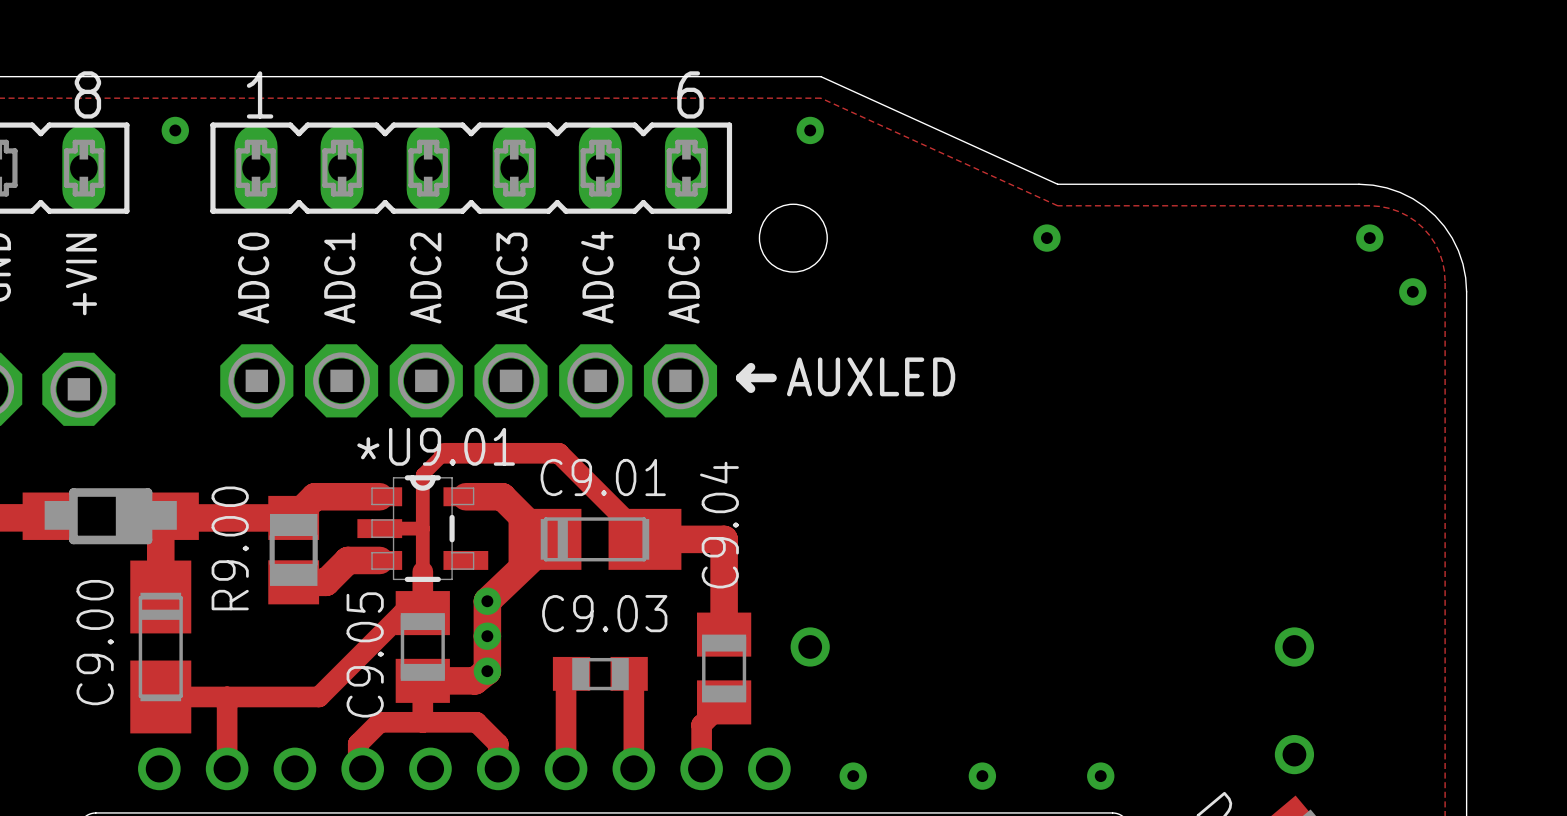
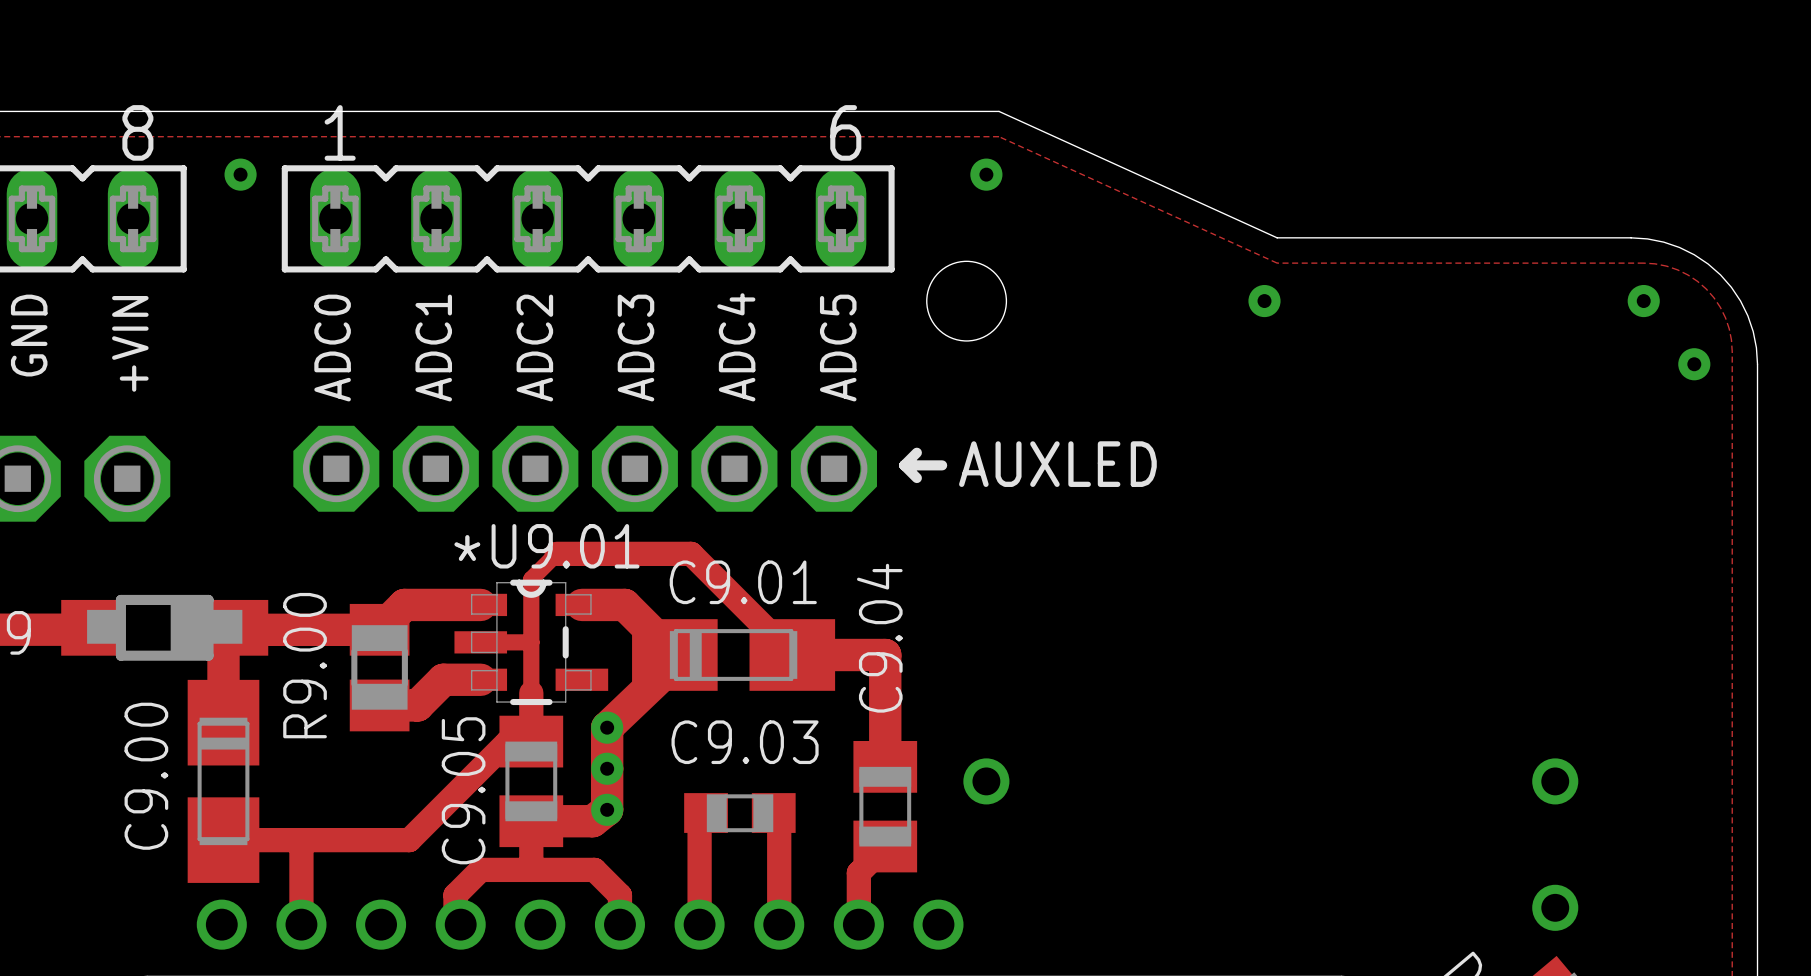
via: (853, 776) -> none
via: (982, 776) -> none
via: (1100, 776) -> none

